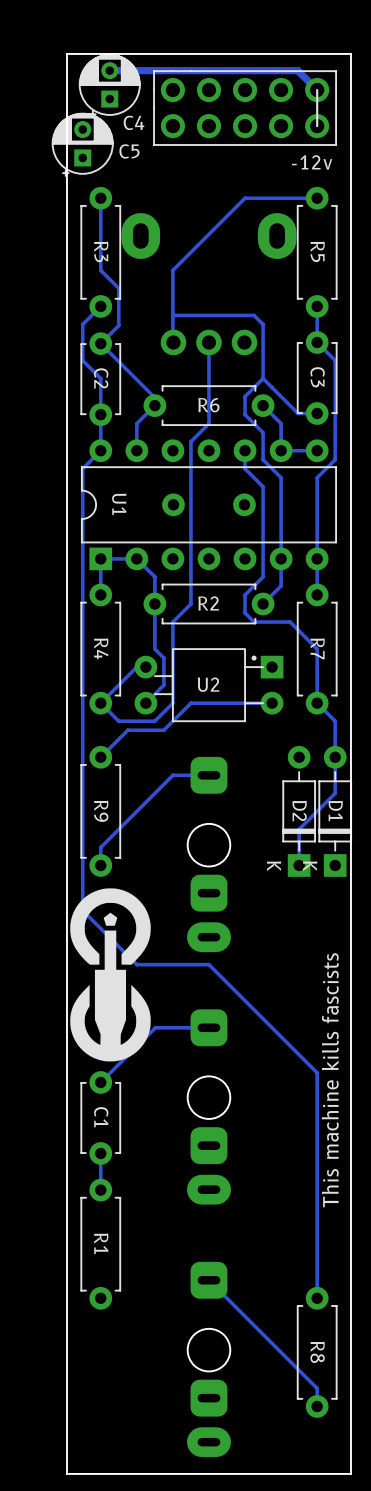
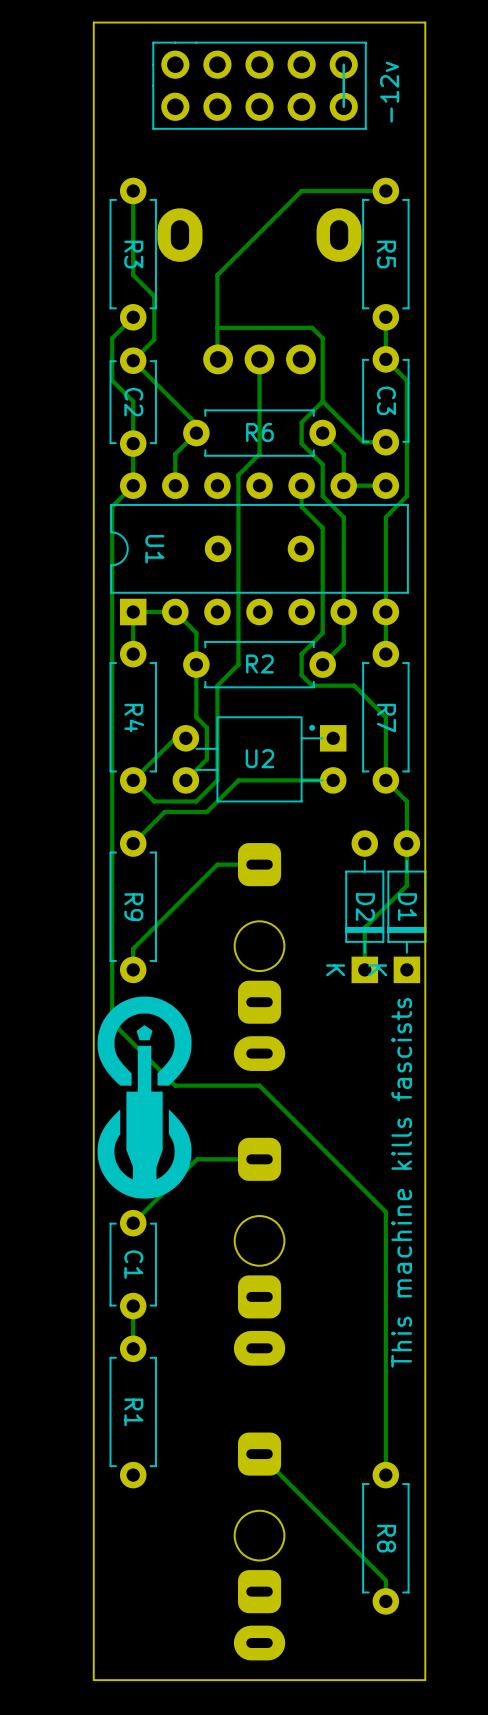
track: (109, 70) (297, 70) (317, 90) -> none
C4: (109, 85) -> none
line: (317, 90) (317, 126) -> (343, 64) (343, 106)
part position: (245, 108) -> (259, 85)
C5: (82, 144) -> none
text rotation: 0° (312, 162) -> 90° counterclockwise (389, 92)

